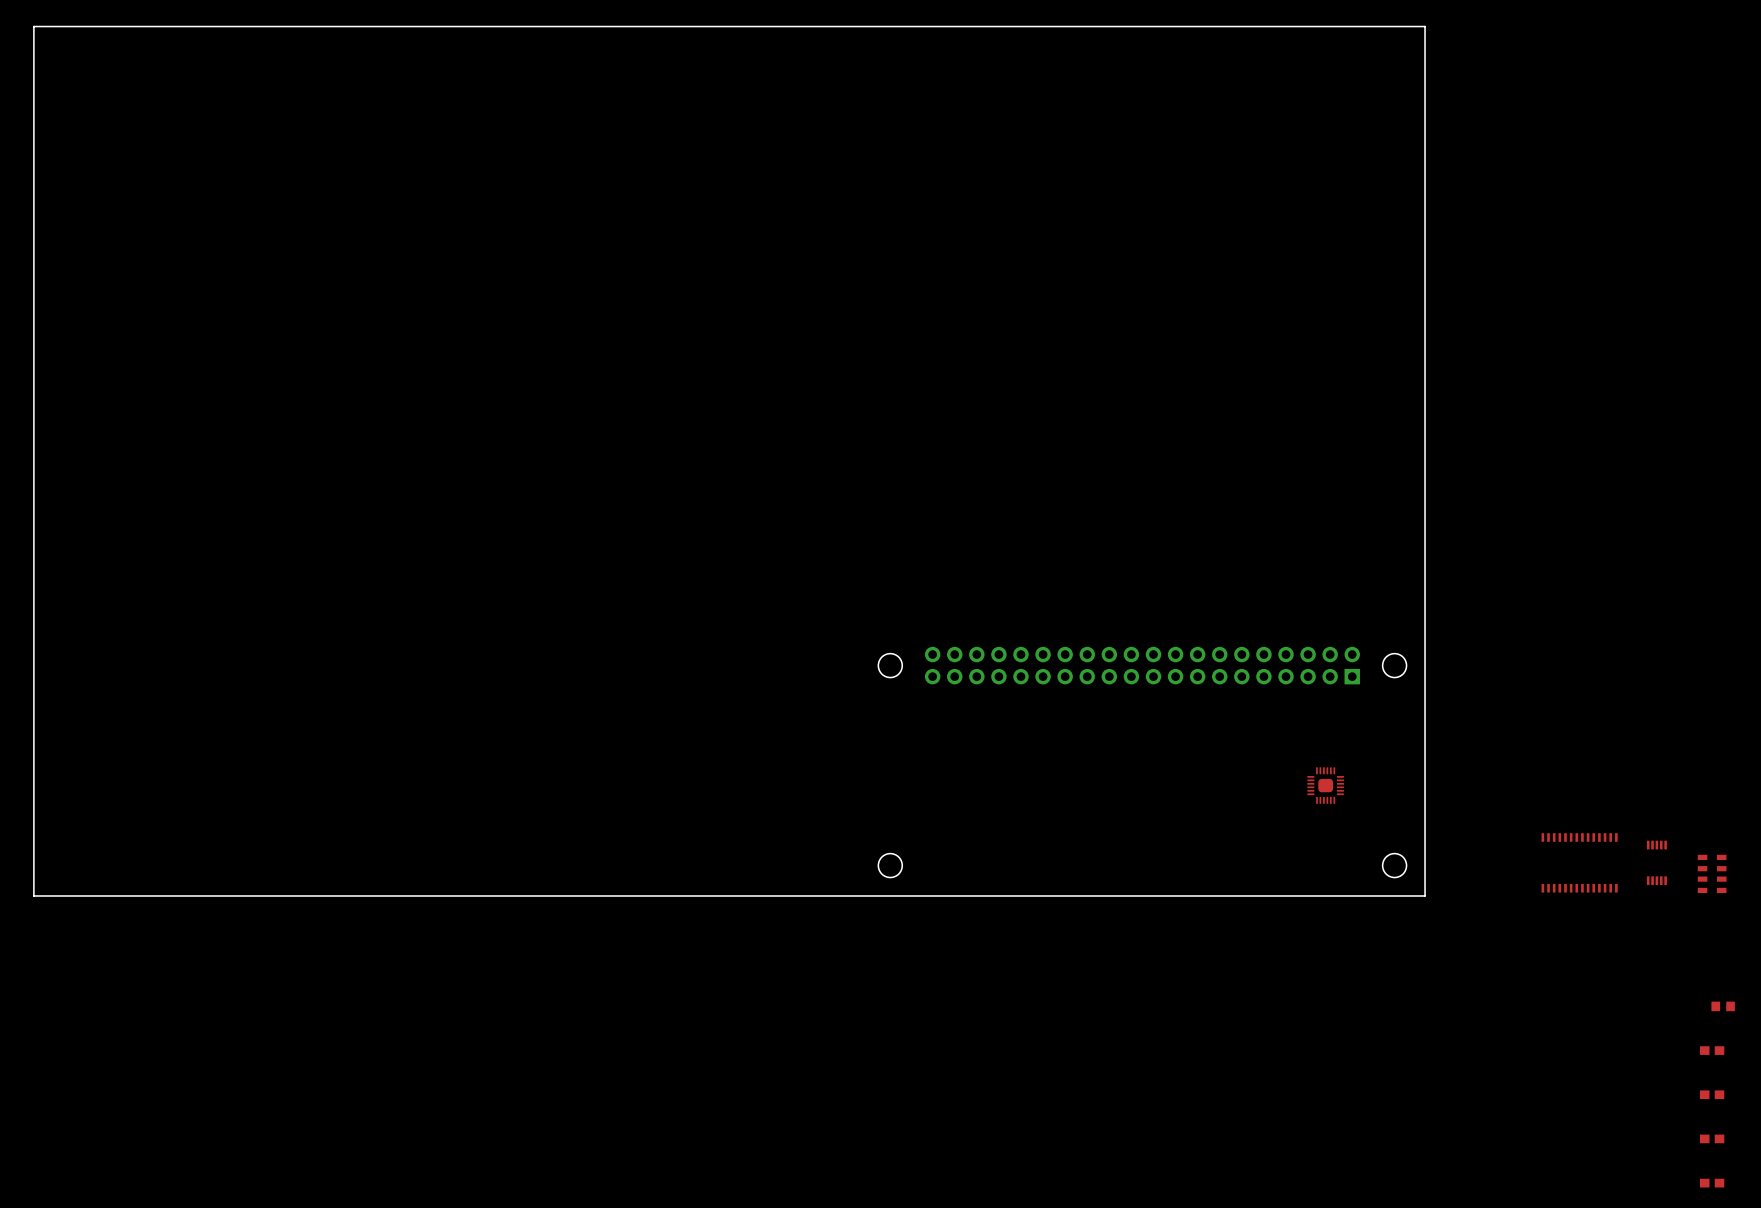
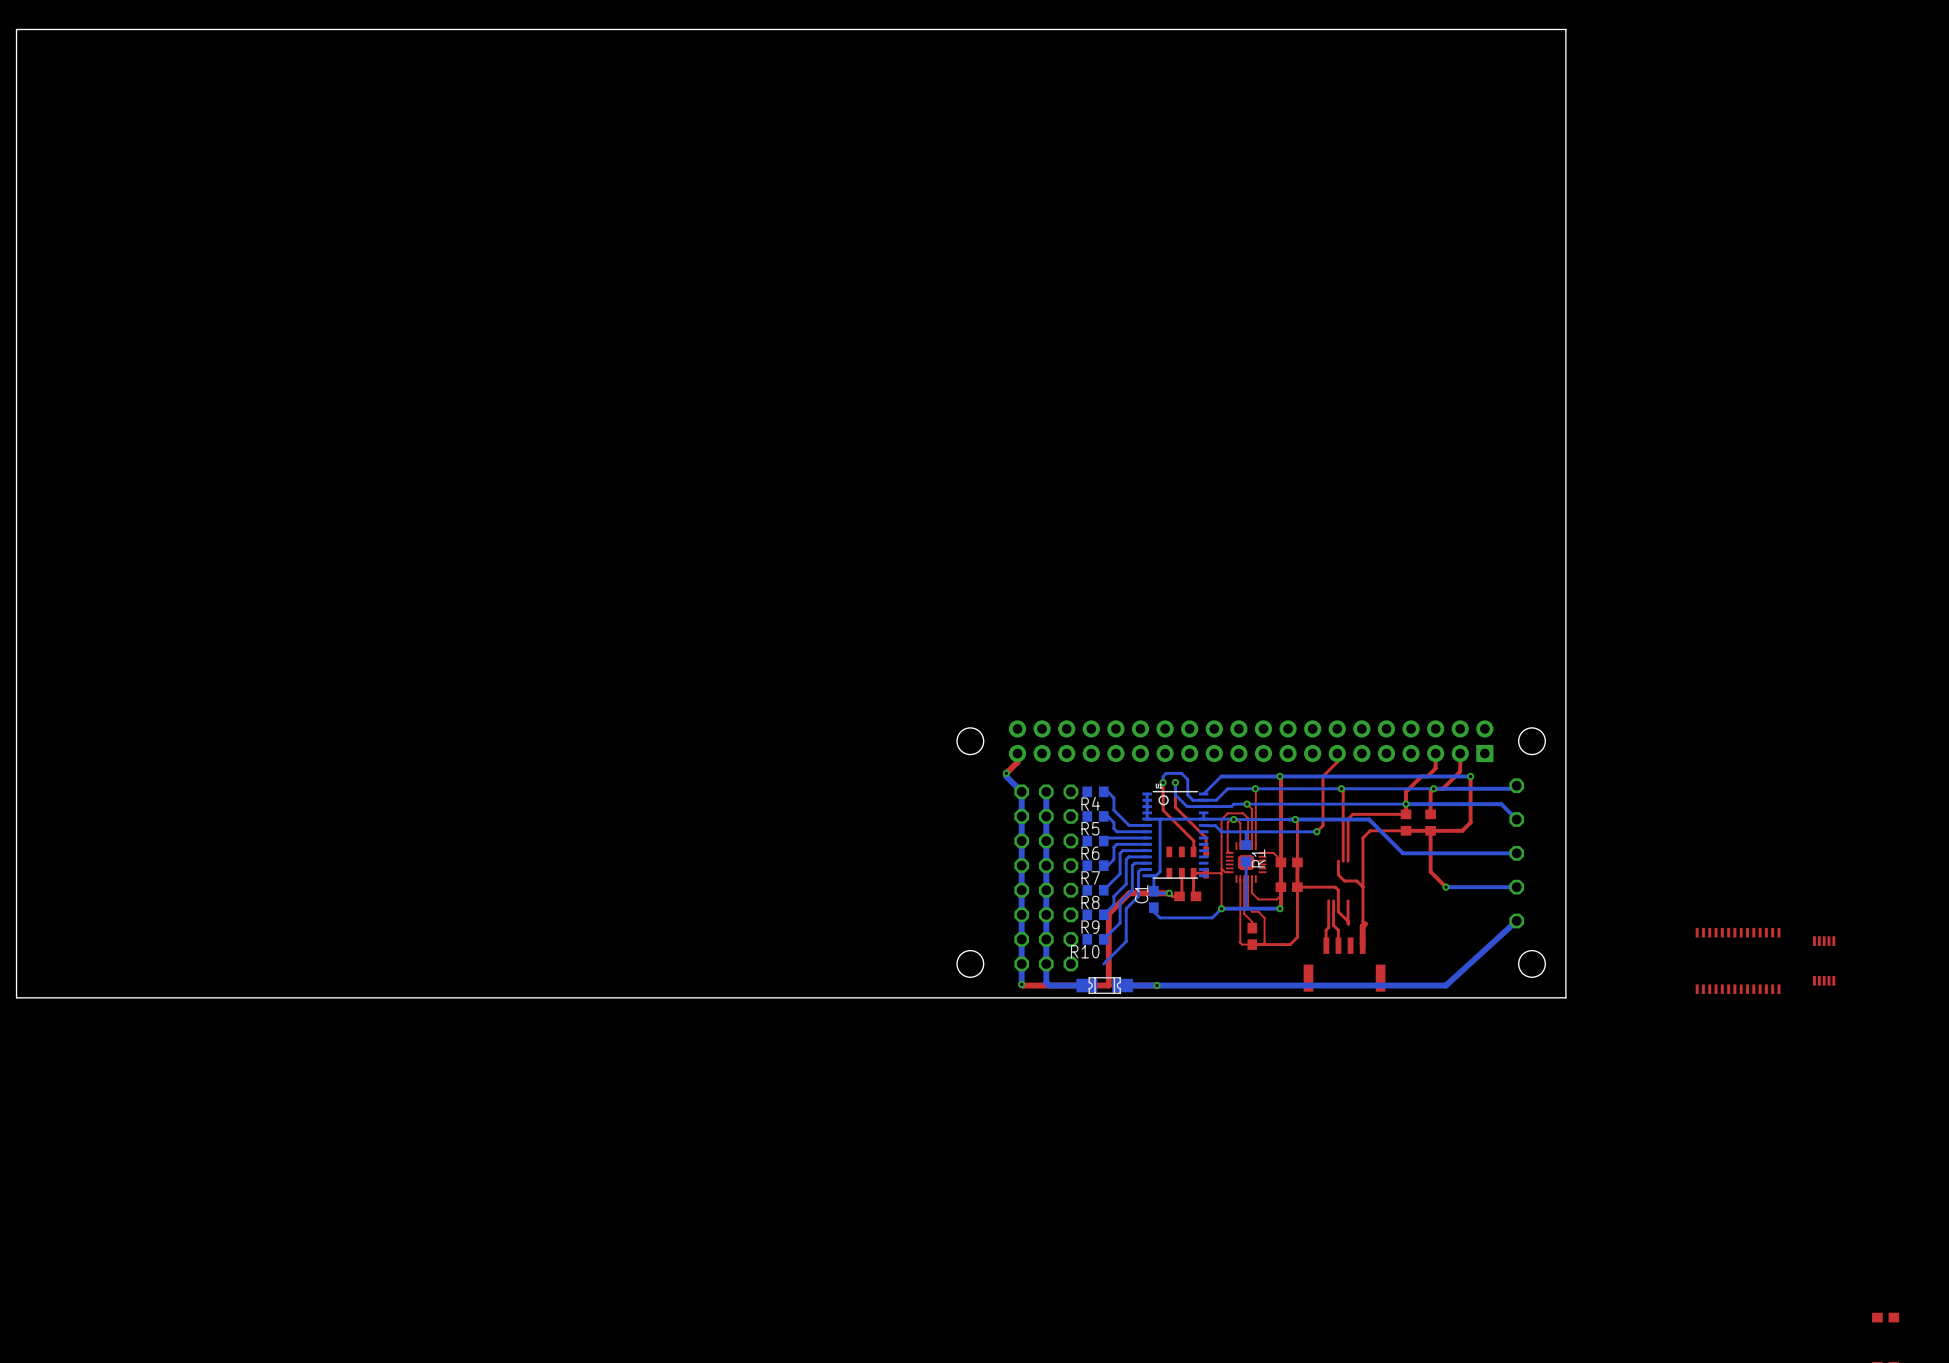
top track: none -> (1017, 753) (1017, 762) (1006, 773)
top track: none -> (1337, 753) (1337, 762) (1323, 776) (1323, 825) (1316, 831)
top track: none -> (1435, 753) (1435, 768) (1427, 776) (1421, 776) (1406, 791) (1406, 814) (1352, 814) (1348, 819) (1348, 861)
top track: none -> (1460, 753) (1460, 771) (1442, 788) (1433, 788) (1430, 791) (1430, 814)
bottom track: none -> (1006, 773) (1006, 776) (1021, 791) (1021, 985)
via: none -> (1006, 773)
top track: none -> (1279, 776) (1279, 908)
via: none -> (1279, 776)
top track: none -> (1470, 776) (1470, 822) (1462, 830) (1370, 830) (1362, 837) (1362, 921) (1365, 924) (1362, 926) (1362, 945)
bottom track: none -> (1470, 776) (1221, 776) (1203, 793)
via: none -> (1470, 776)
top track: none -> (1163, 782) (1163, 810) (1193, 841) (1193, 851)
bottom track: none -> (1163, 782) (1163, 776) (1166, 773) (1181, 773) (1187, 779) (1187, 794) (1193, 800) (1216, 800) (1227, 788) (1513, 788) (1516, 785)
via: none -> (1163, 782)
top track: none -> (1175, 782) (1175, 807) (1206, 837) (1206, 851)
bottom track: none -> (1175, 782) (1175, 794) (1187, 806) (1231, 806) (1233, 804) (1406, 804)
via: none -> (1175, 782)
part: none -> (1516, 785)
top track: none -> (1255, 788) (1255, 846)
via: none -> (1255, 788)
top track: none -> (1341, 788) (1343, 790) (1343, 861)
via: none -> (1341, 788)
via: none -> (1433, 788)
bottom track: none -> (1046, 791) (1046, 982) (1049, 985) (1086, 985)
R4: none -> (1095, 791)
bottom track: none -> (1103, 791) (1107, 791) (1113, 797) (1113, 810) (1129, 825) (1147, 825)
bottom track: none -> (1147, 793) (1147, 819) (1295, 819)
top track: none -> (1247, 804) (1251, 809) (1251, 846)
via: none -> (1247, 804)
bottom track: none -> (1404, 804) (1501, 804) (1516, 819)
via: none -> (1406, 804)
bottom track: none -> (1203, 812) (1203, 819)
R5: none -> (1095, 816)
bottom track: none -> (1103, 816) (1107, 816) (1113, 822) (1113, 828) (1116, 831) (1147, 831)
bottom track: none -> (1160, 819) (1160, 871) (1156, 875) (1147, 875)
via: none -> (1233, 819)
bottom track: none -> (1289, 819) (1369, 819) (1402, 853) (1516, 853)
top track: none -> (1295, 819) (1297, 821) (1297, 887)
via: none -> (1295, 819)
part: none -> (1516, 819)
part: none -> (1406, 822)
part: none -> (1430, 822)
bottom track: none -> (1203, 825) (1215, 825) (1221, 831) (1316, 831)
bottom track: none -> (1246, 831) (1246, 845)
via: none -> (1316, 831)
top track: none -> (1430, 830) (1430, 871) (1445, 887)
part: none -> (1175, 834)
bottom track: none -> (1147, 838) (1106, 838) (1103, 841)
R6: none -> (1095, 841)
bottom track: none -> (1147, 844) (1116, 844) (1113, 847) (1113, 859) (1107, 865) (1103, 865)
top track: none -> (1240, 846) (1240, 822) (1236, 819) (1230, 819) (1227, 822) (1227, 850) (1229, 852)
top track: none -> (1248, 846) (1248, 818) (1243, 813) (1227, 813) (1221, 819) (1221, 908)
bottom track: none -> (1147, 850) (1122, 850) (1120, 853) (1120, 873) (1103, 890)
top track: none -> (1262, 852) (1273, 852) (1280, 862)
R1: none -> (1246, 853)
part: none -> (1516, 853)
bottom track: none -> (1147, 856) (1128, 856) (1126, 859) (1126, 884) (1113, 896) (1113, 904) (1103, 914)
bottom track: none -> (1246, 861) (1246, 908)
top track: none -> (1338, 861) (1338, 874) (1344, 881) (1356, 881) (1362, 887)
part: none -> (1187, 862)
part: none -> (1289, 862)
bottom track: none -> (1147, 863) (1134, 863) (1132, 865) (1132, 890) (1120, 902) (1120, 923) (1103, 939)
R7: none -> (1095, 865)
bottom track: none -> (1147, 869) (1140, 869) (1138, 871) (1138, 896) (1126, 908) (1126, 941) (1103, 964)
top track: none -> (1221, 868) (1225, 872) (1229, 872)
top track: none -> (1181, 873) (1181, 893) (1179, 896) (1172, 896) (1169, 893) (1129, 893) (1108, 913) (1108, 985) (1021, 984)
top track: none -> (1221, 874) (1193, 873) (1193, 893) (1195, 896)
part position: (1325, 785) -> (1246, 862)
bottom track: none -> (1153, 875) (1153, 891) (1155, 893) (1169, 893)
part: none -> (1046, 877)
top track: none -> (1244, 879) (1244, 913) (1252, 921) (1252, 928)
top track: none -> (1248, 879) (1248, 907) (1252, 911) (1258, 911) (1264, 917) (1264, 942) (1262, 944) (1242, 944) (1239, 942) (1240, 879)
top track: none -> (1251, 879) (1251, 892) (1258, 899) (1276, 899) (1280, 895) (1280, 887)
part: none -> (1289, 887)
top track: none -> (1297, 887) (1335, 887) (1338, 890) (1338, 911) (1348, 921) (1348, 924) (1348, 923) (1348, 900)
top track: none -> (1297, 887) (1297, 937) (1290, 944) (1252, 944)
via: none -> (1445, 887)
bottom track: none -> (1516, 887) (1445, 887)
part: none -> (1516, 887)
R8: none -> (1095, 890)
via: none -> (1169, 893)
part: none -> (1187, 896)
C1: none -> (1153, 899)
top track: none -> (1328, 900) (1326, 945)
top track: none -> (1333, 900) (1333, 925) (1338, 930) (1338, 945)
bottom track: none -> (1153, 907) (1153, 911) (1160, 917) (1212, 917) (1221, 908) (1279, 908)
via: none -> (1221, 908)
via: none -> (1279, 908)
R9: none -> (1095, 914)
bottom track: none -> (1516, 920) (1445, 985) (1122, 985)
part: none -> (1516, 920)
part: none -> (1252, 936)
R10: none -> (1095, 939)
part: none -> (1344, 964)
part: (1712, 873) -> none
via: none -> (1021, 984)
part: none -> (1104, 985)
via: none -> (1156, 985)
part: (1723, 1006) -> none
part: (1712, 1050) -> none
part: (1712, 1094) -> none
part: (1712, 1138) -> none

